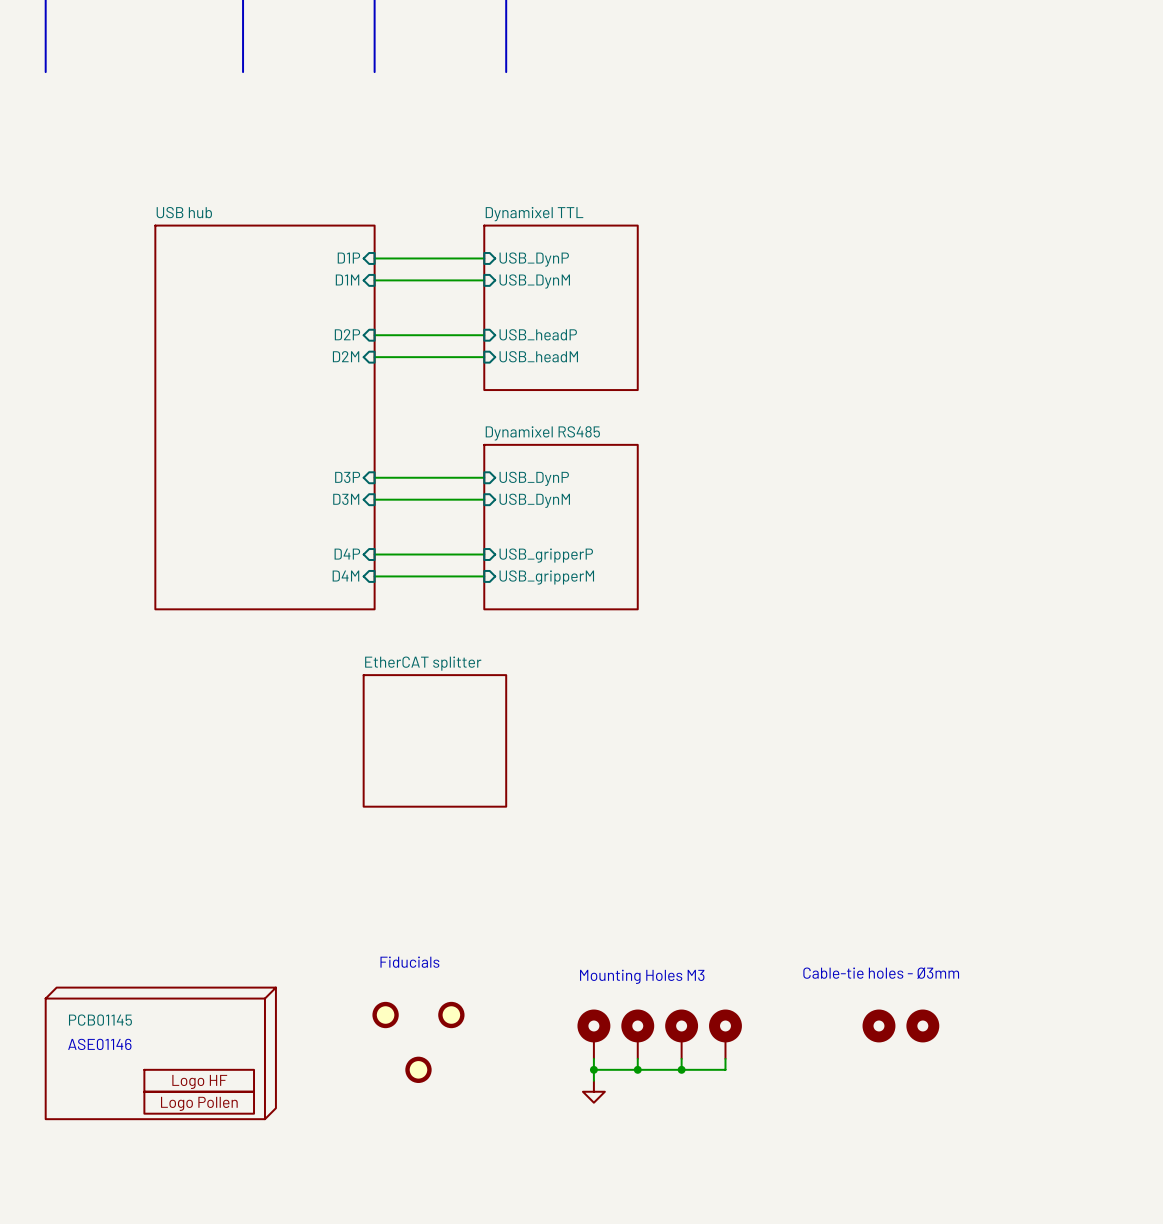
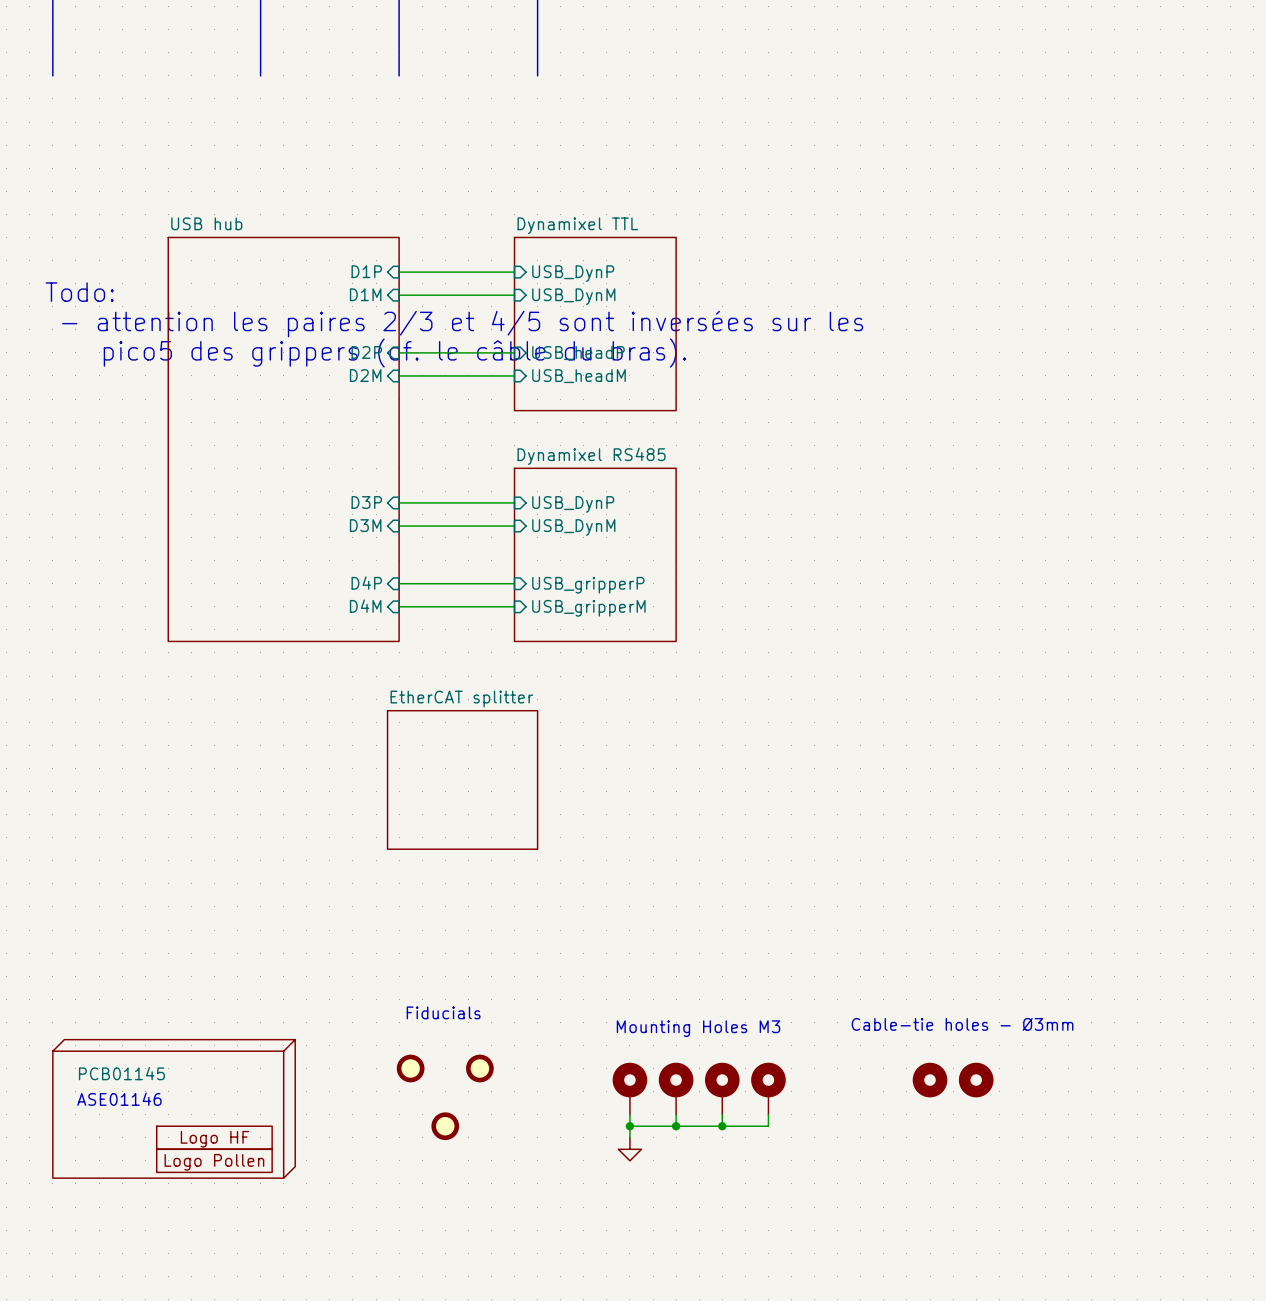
text: none -> Todo: (79, 292)
text: none -> - attention les paires 2/3 et 4/5 sont inversées sur les (462, 324)
text: none -> pico5 des grippers (cf. le câble du bras). (394, 352)

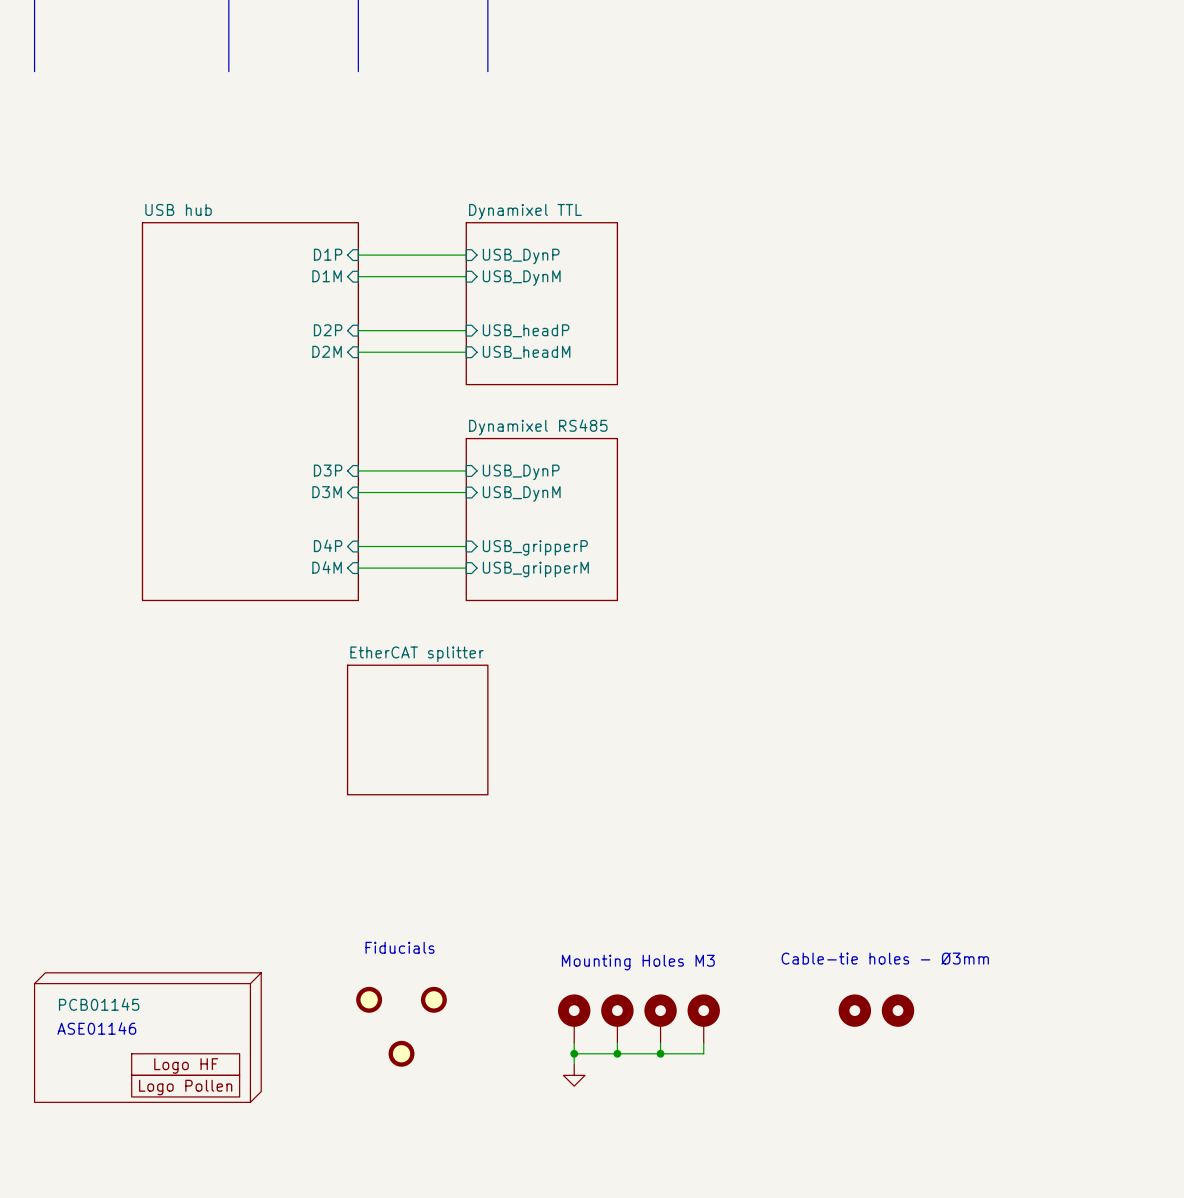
text: Todo: (79, 292) -> none
text: - attention les paires 2/3 et 4/5 sont inversées sur les (462, 324) -> none
text: pico5 des grippers (cf. le câble du bras). (394, 352) -> none

